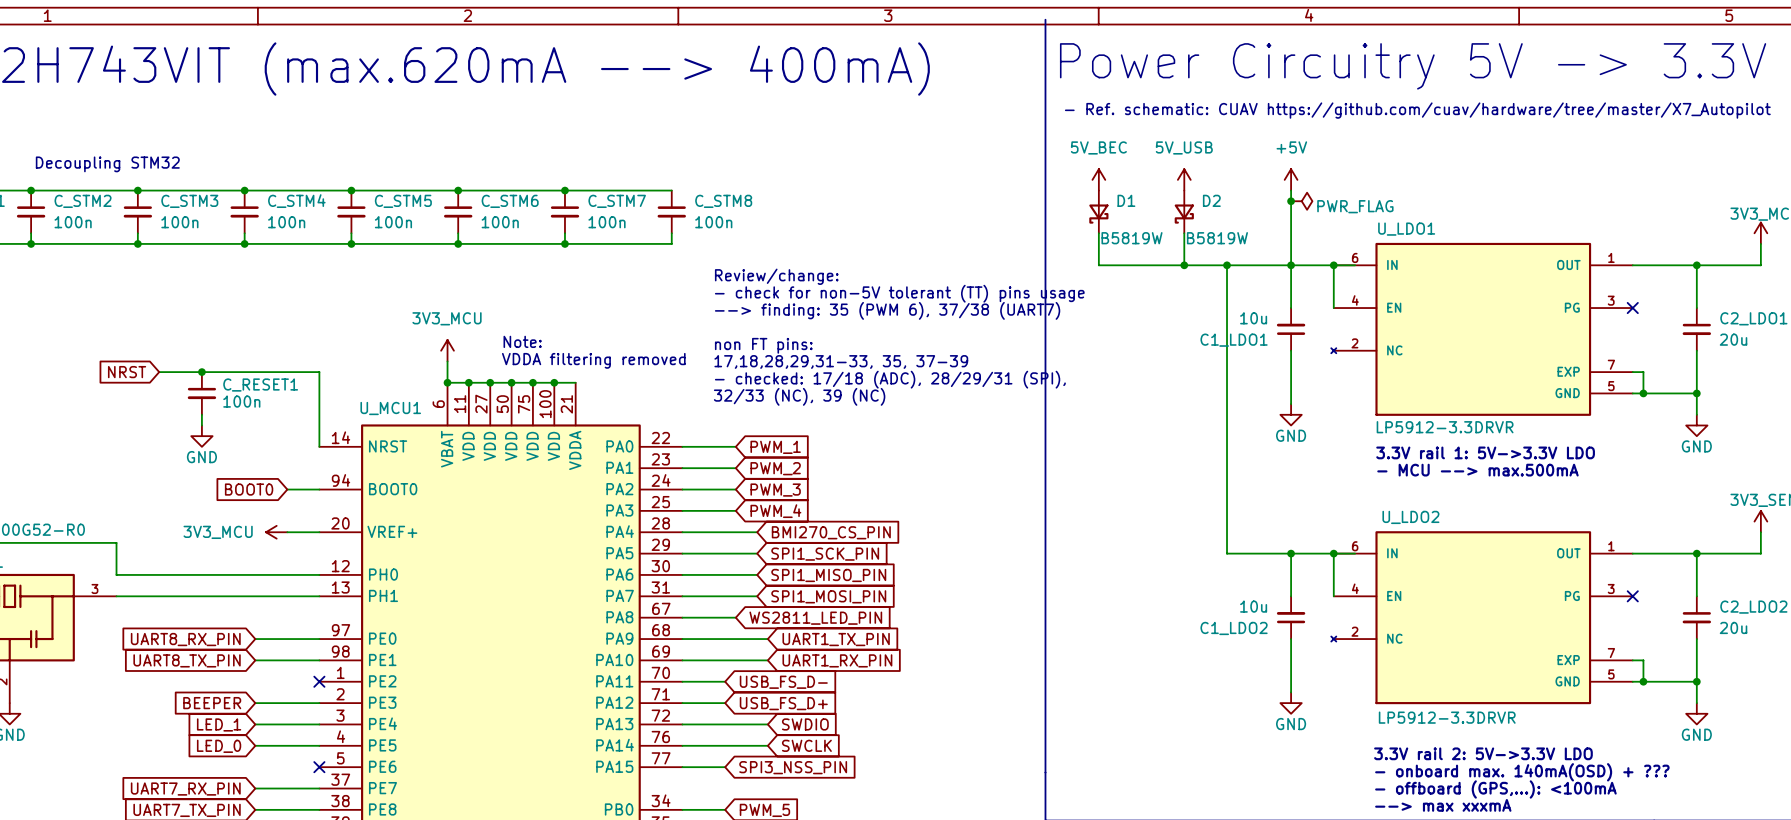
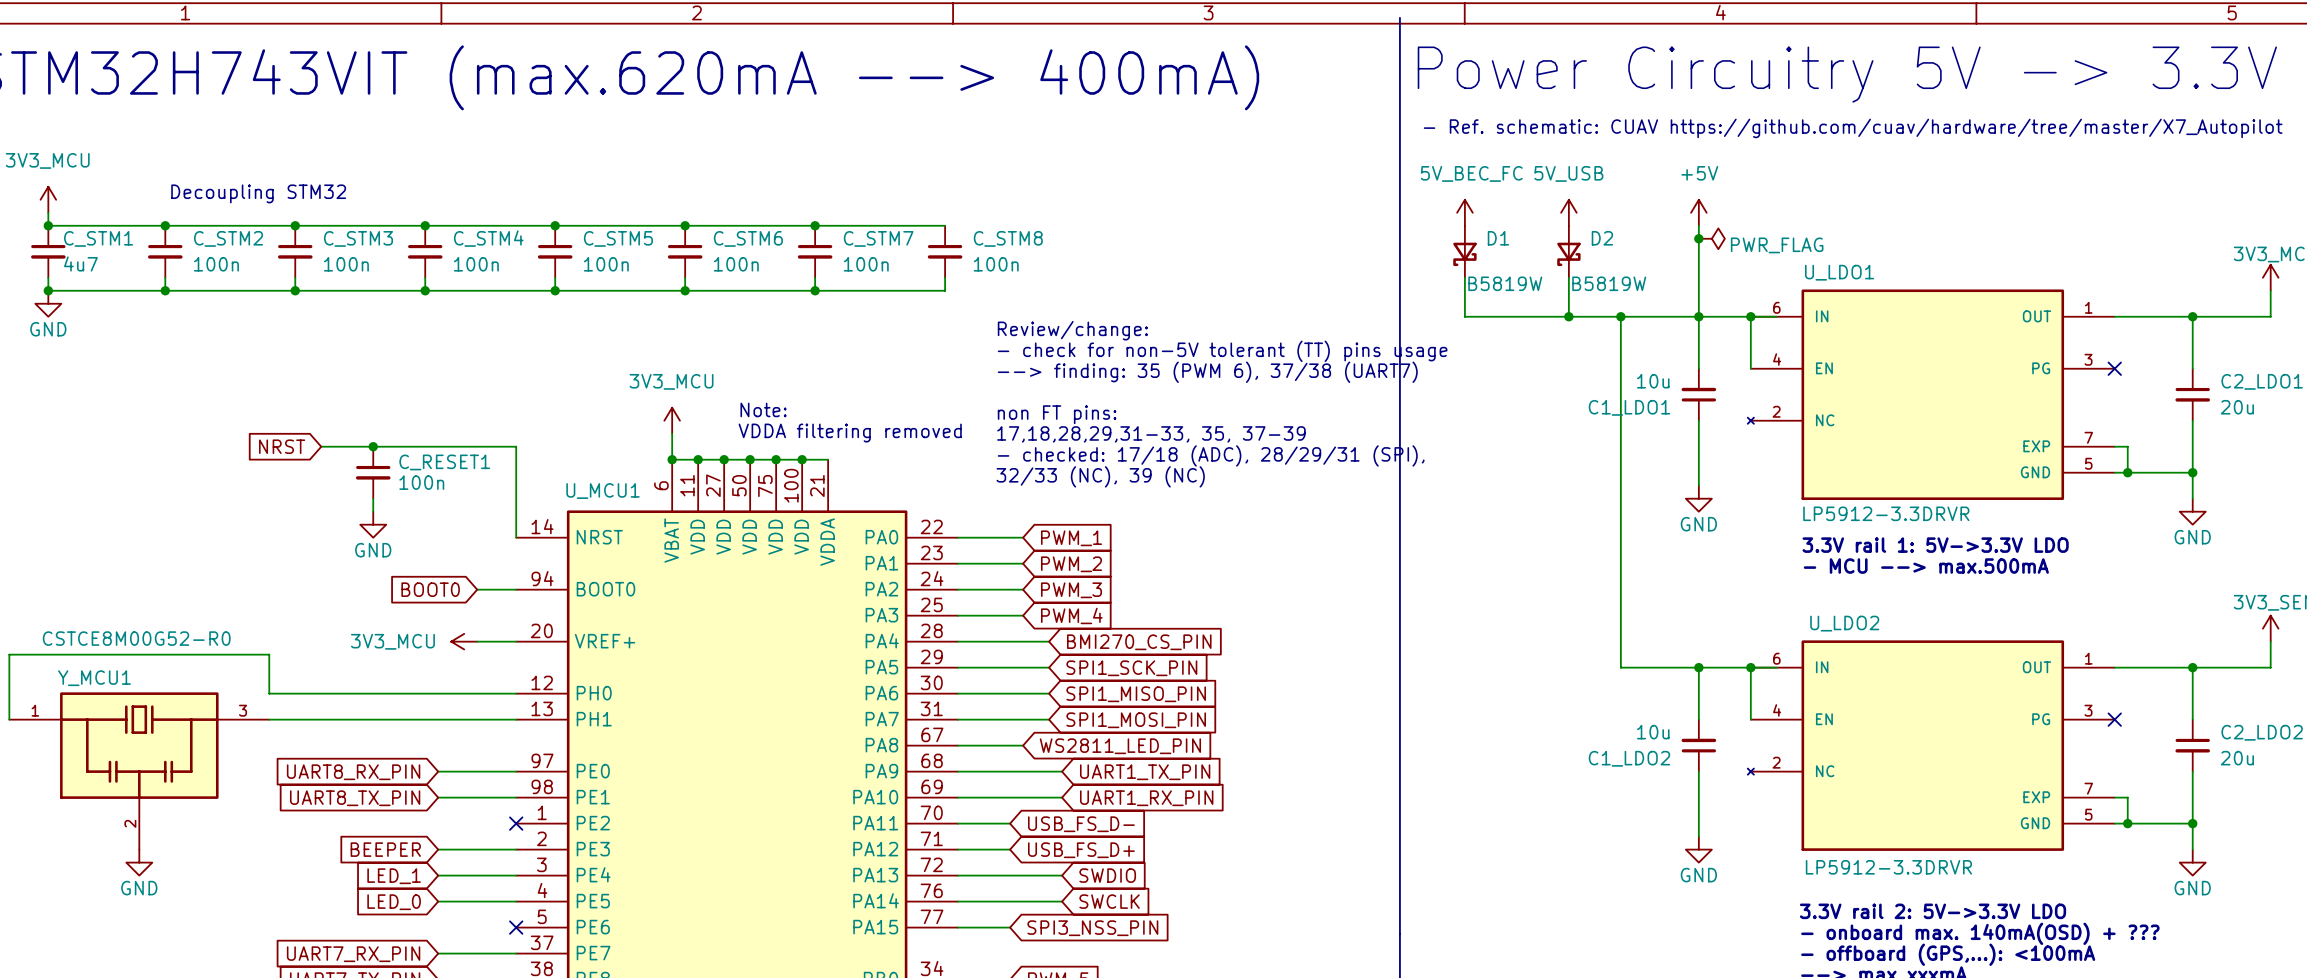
power symbol: 5V_BEC (1098, 179) -> 5V_BEC_FC (1464, 212)

